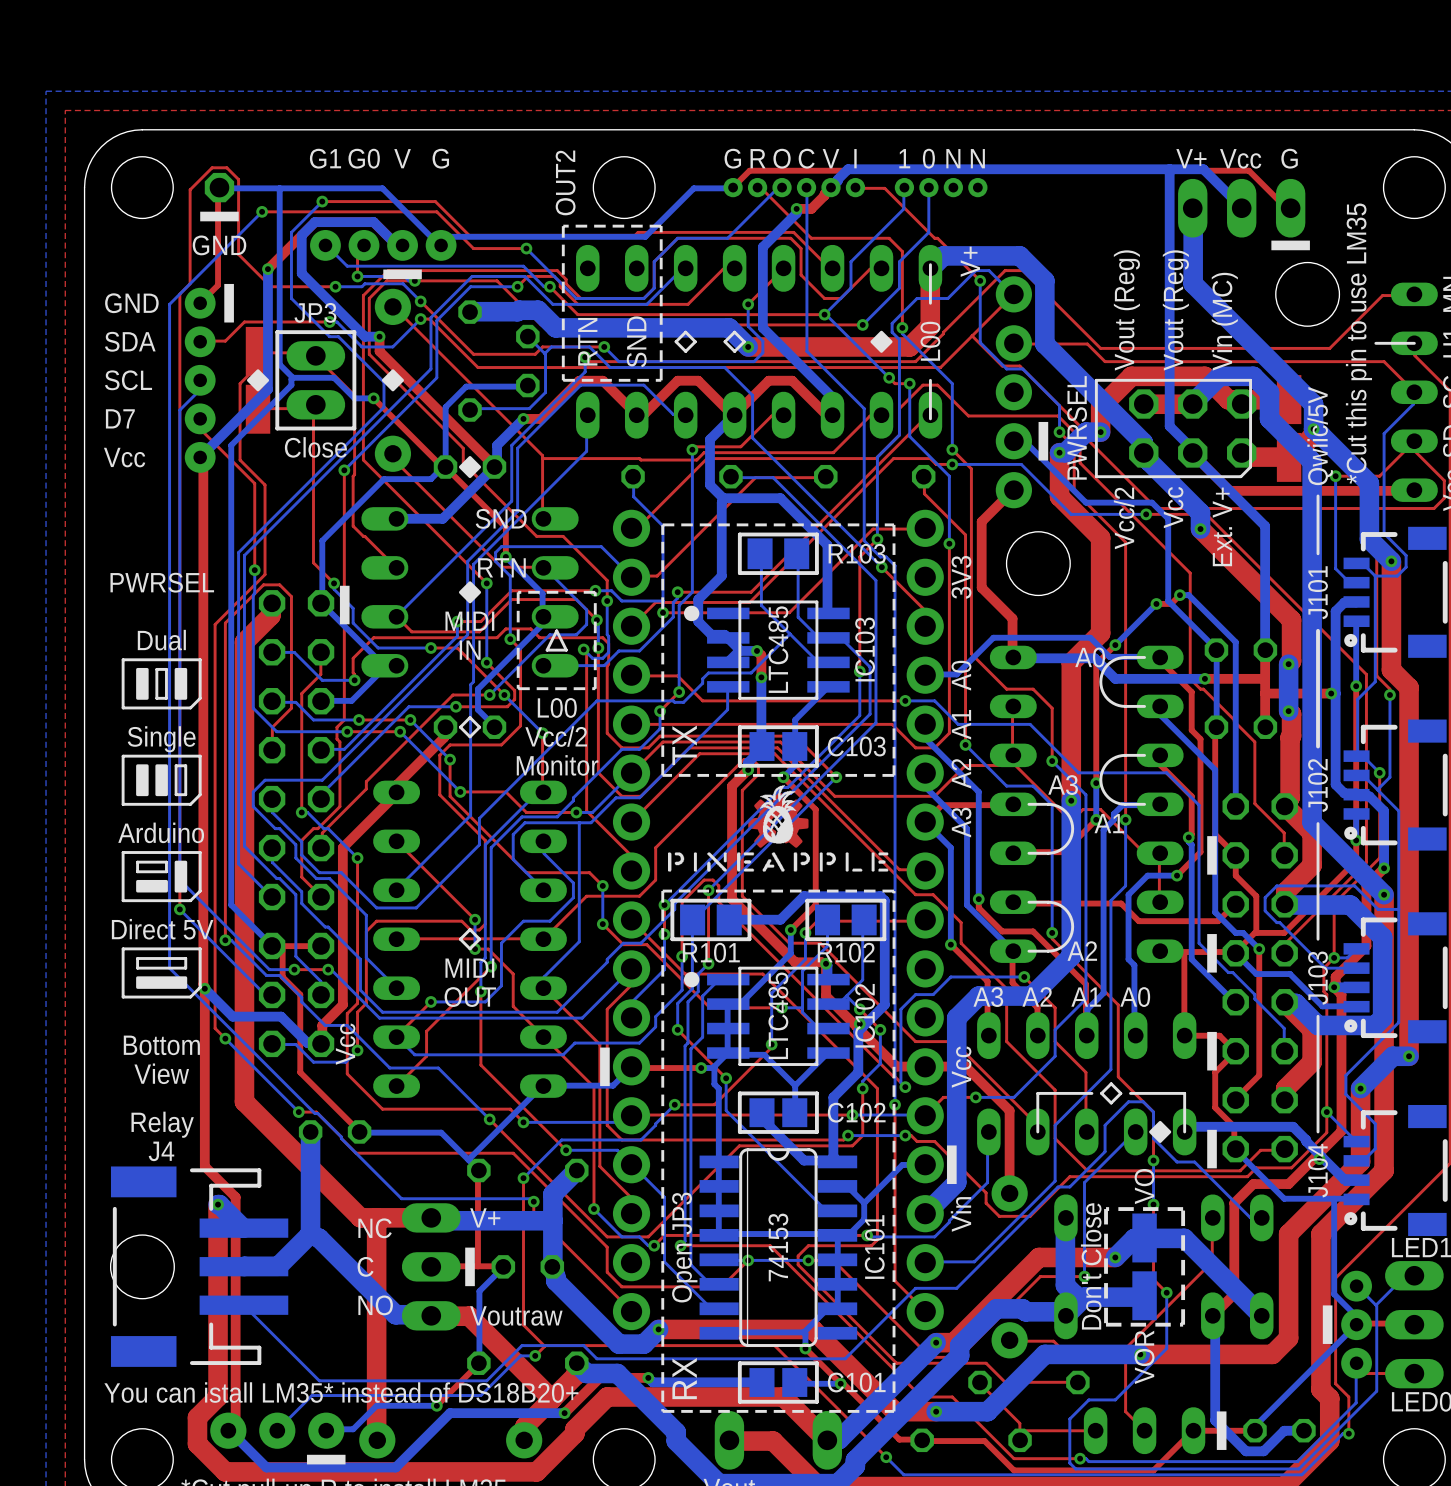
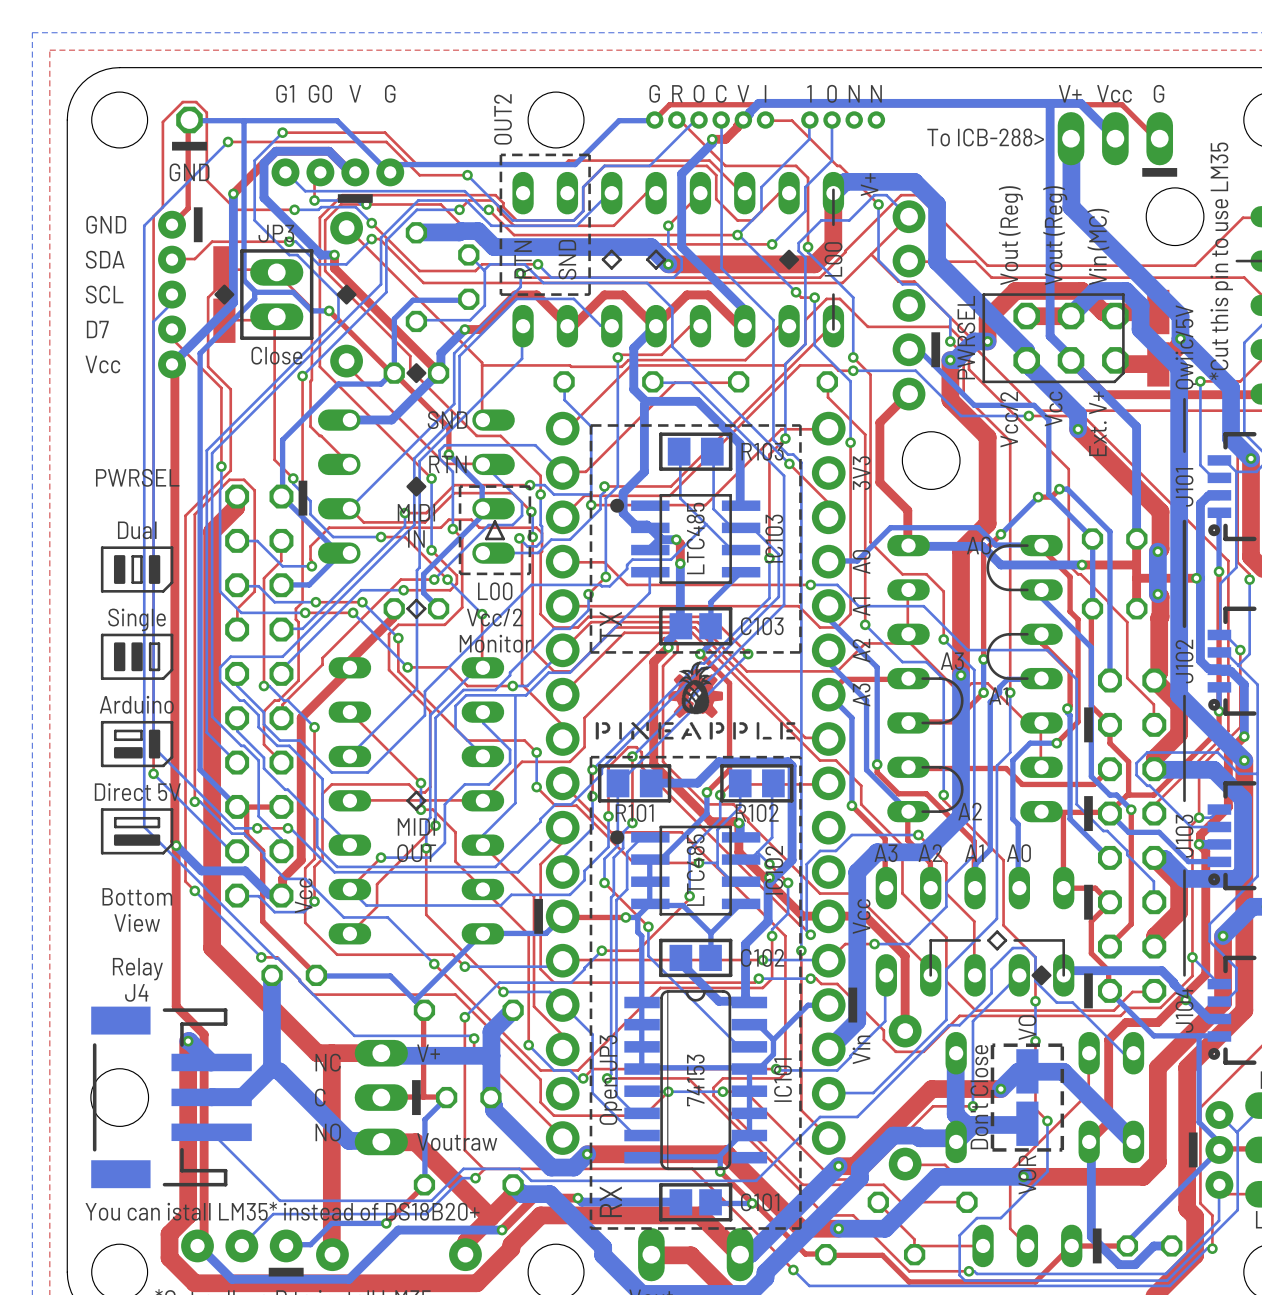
text: none -> To ICB-288> (985, 137)

